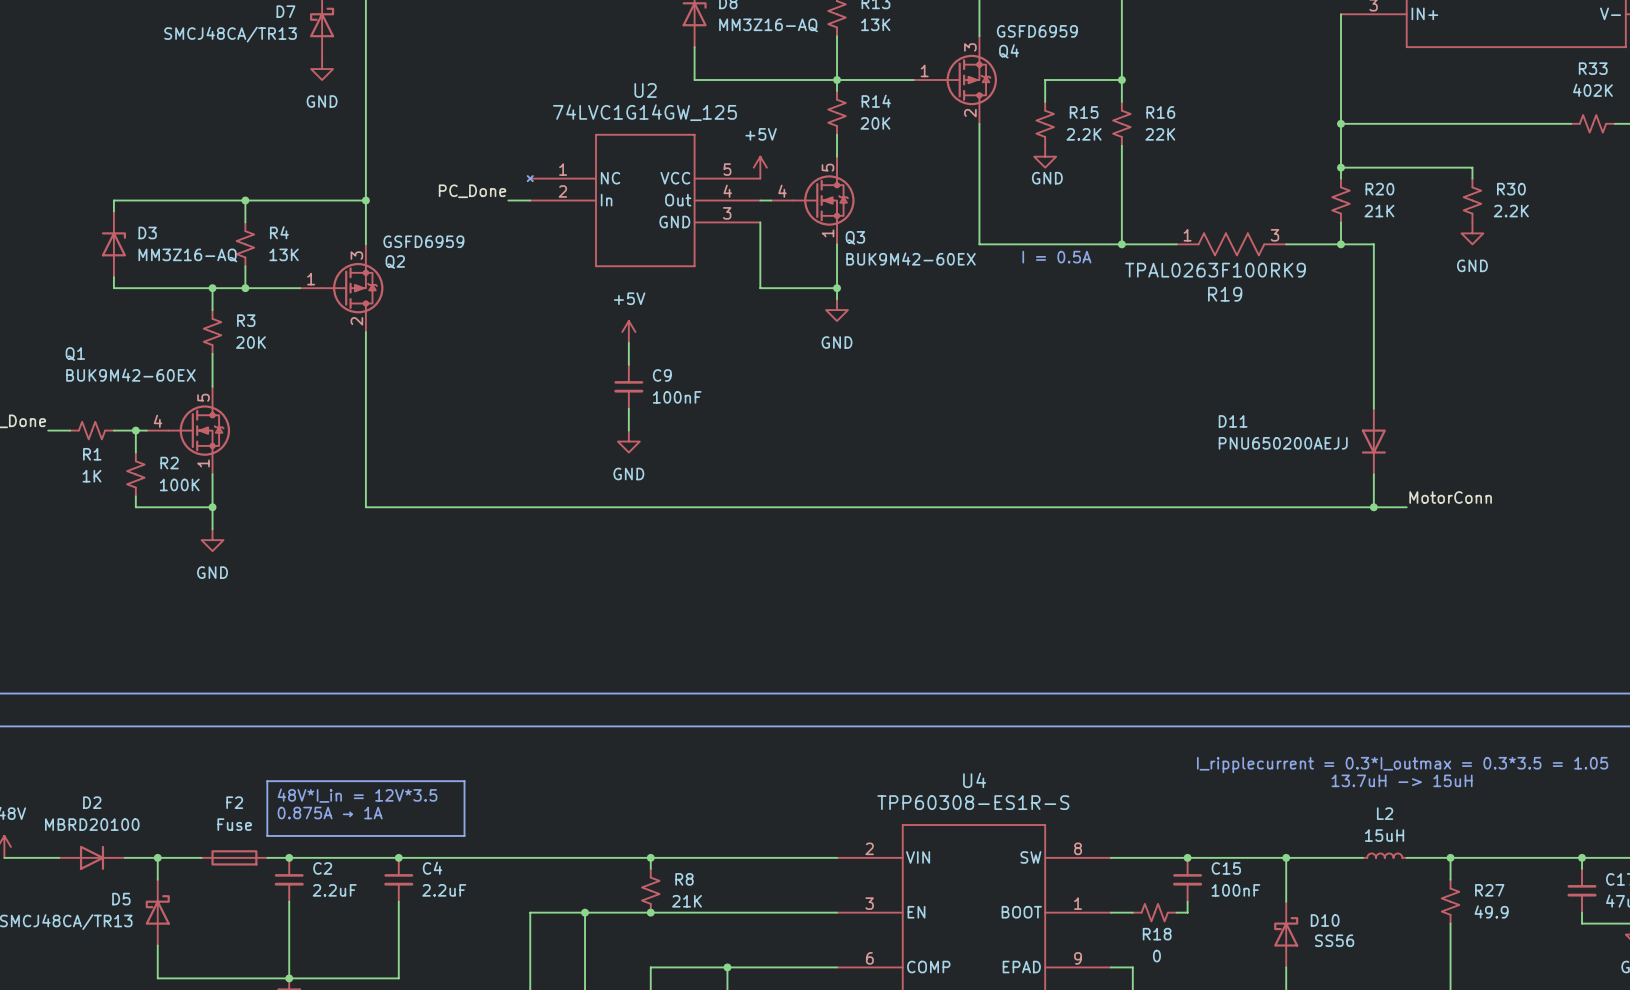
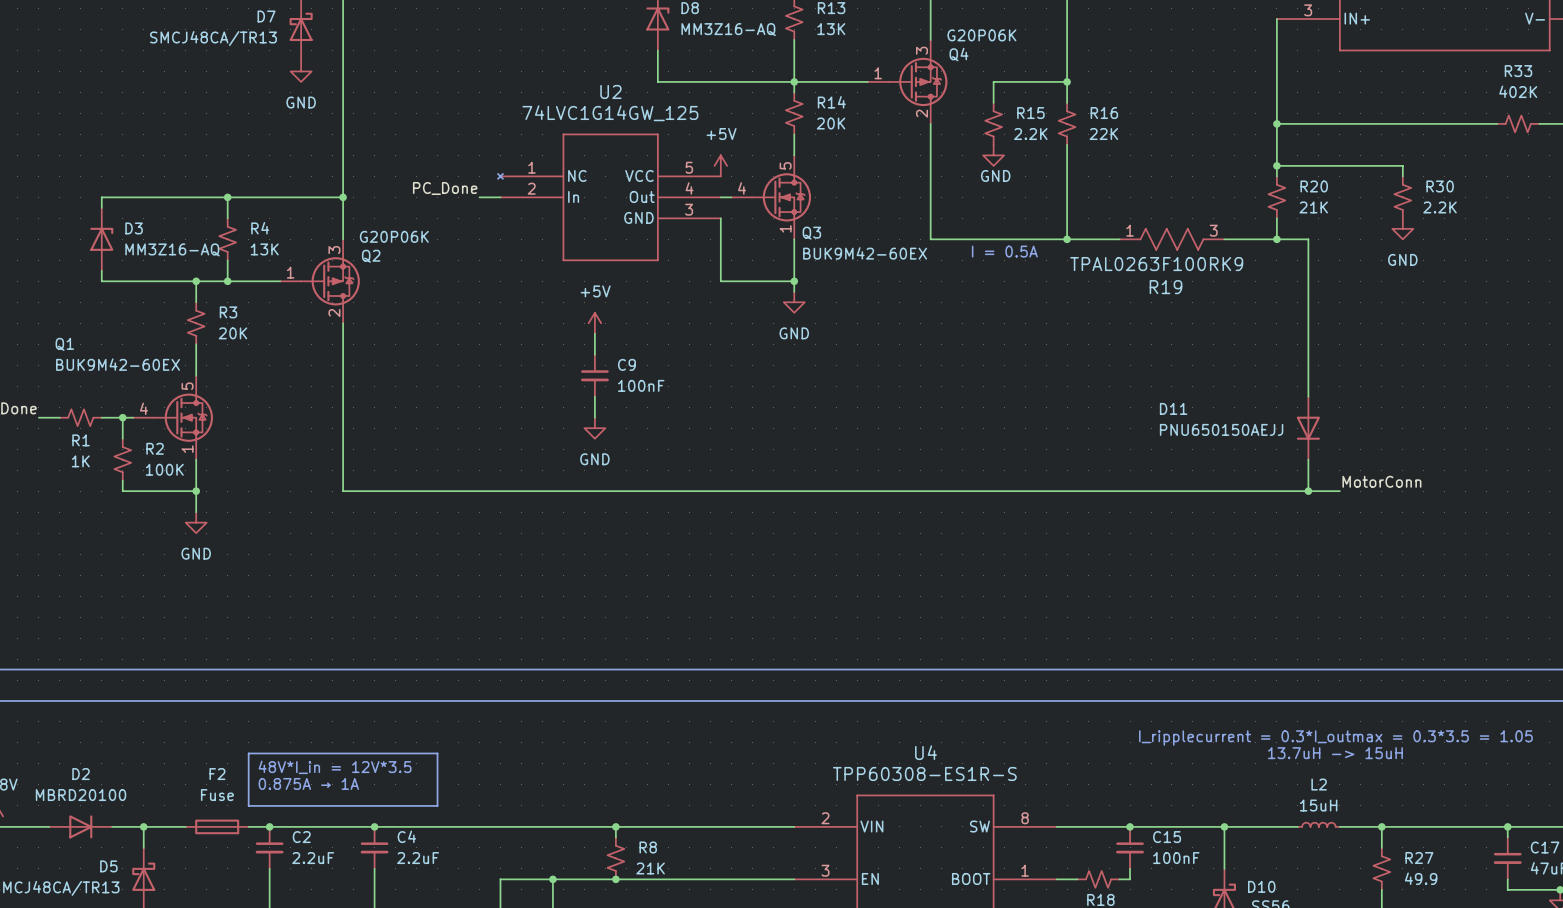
Q4 value: GSFD6959 (1037, 31) -> G20P06K (981, 35)
Q2 value: GSFD6959 (423, 241) -> G20P06K (394, 236)
D11 value: PNU650200AEJJ (1283, 443) -> PNU650150AEJJ (1221, 429)

